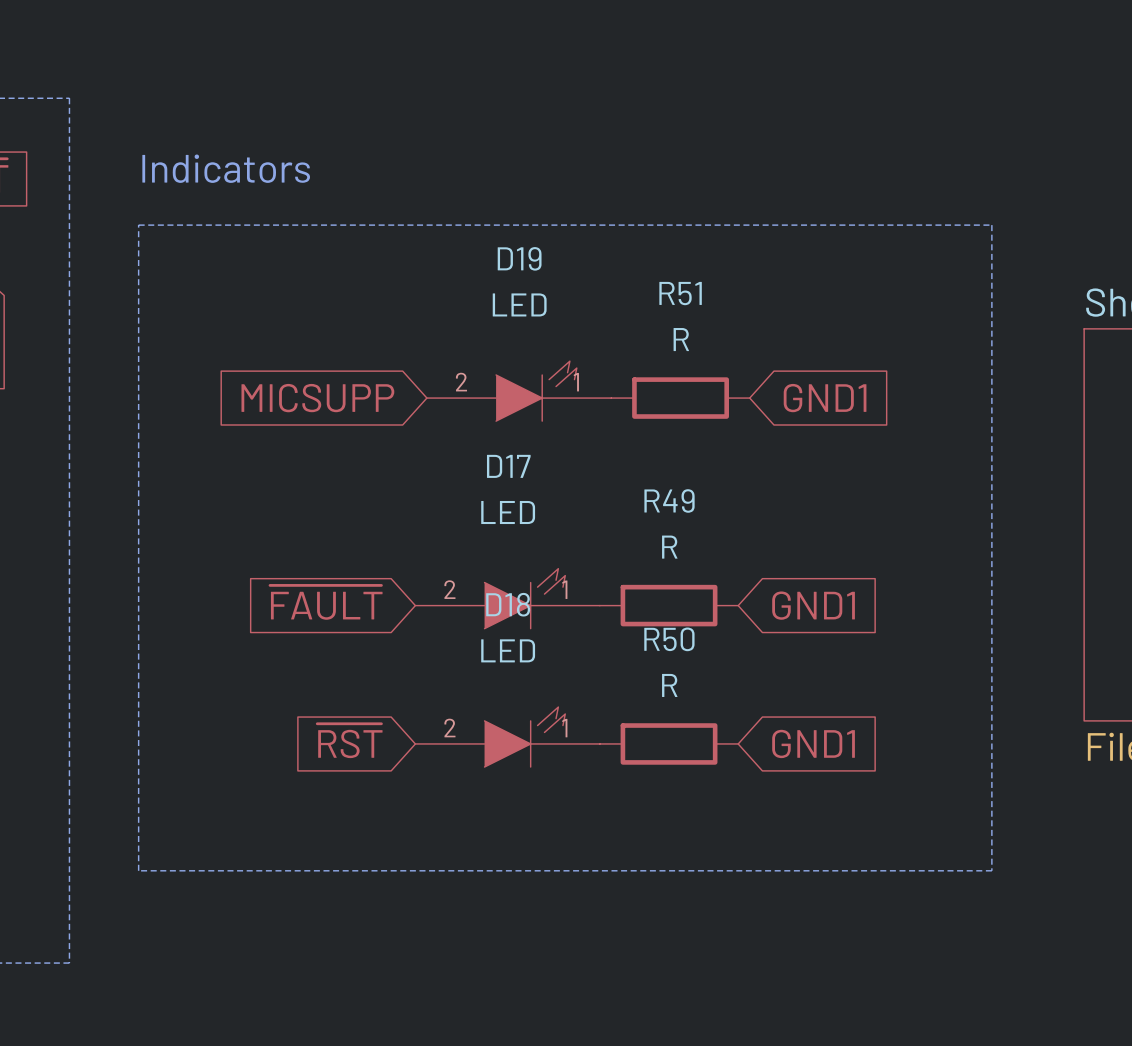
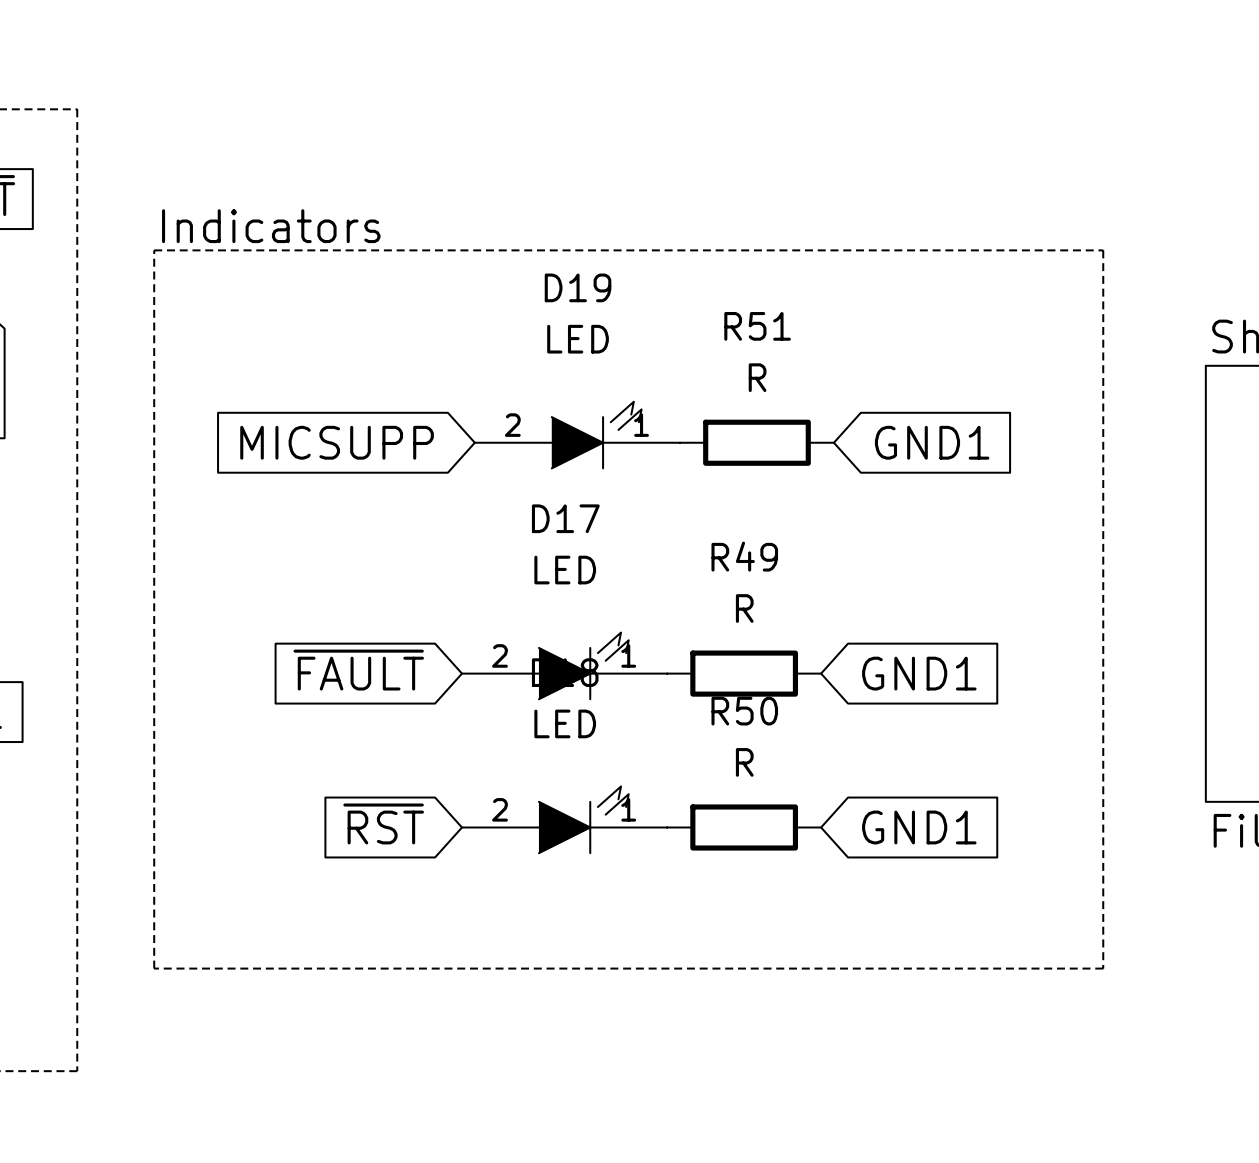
text position: Indicators (226, 168) -> Indicators (271, 226)

